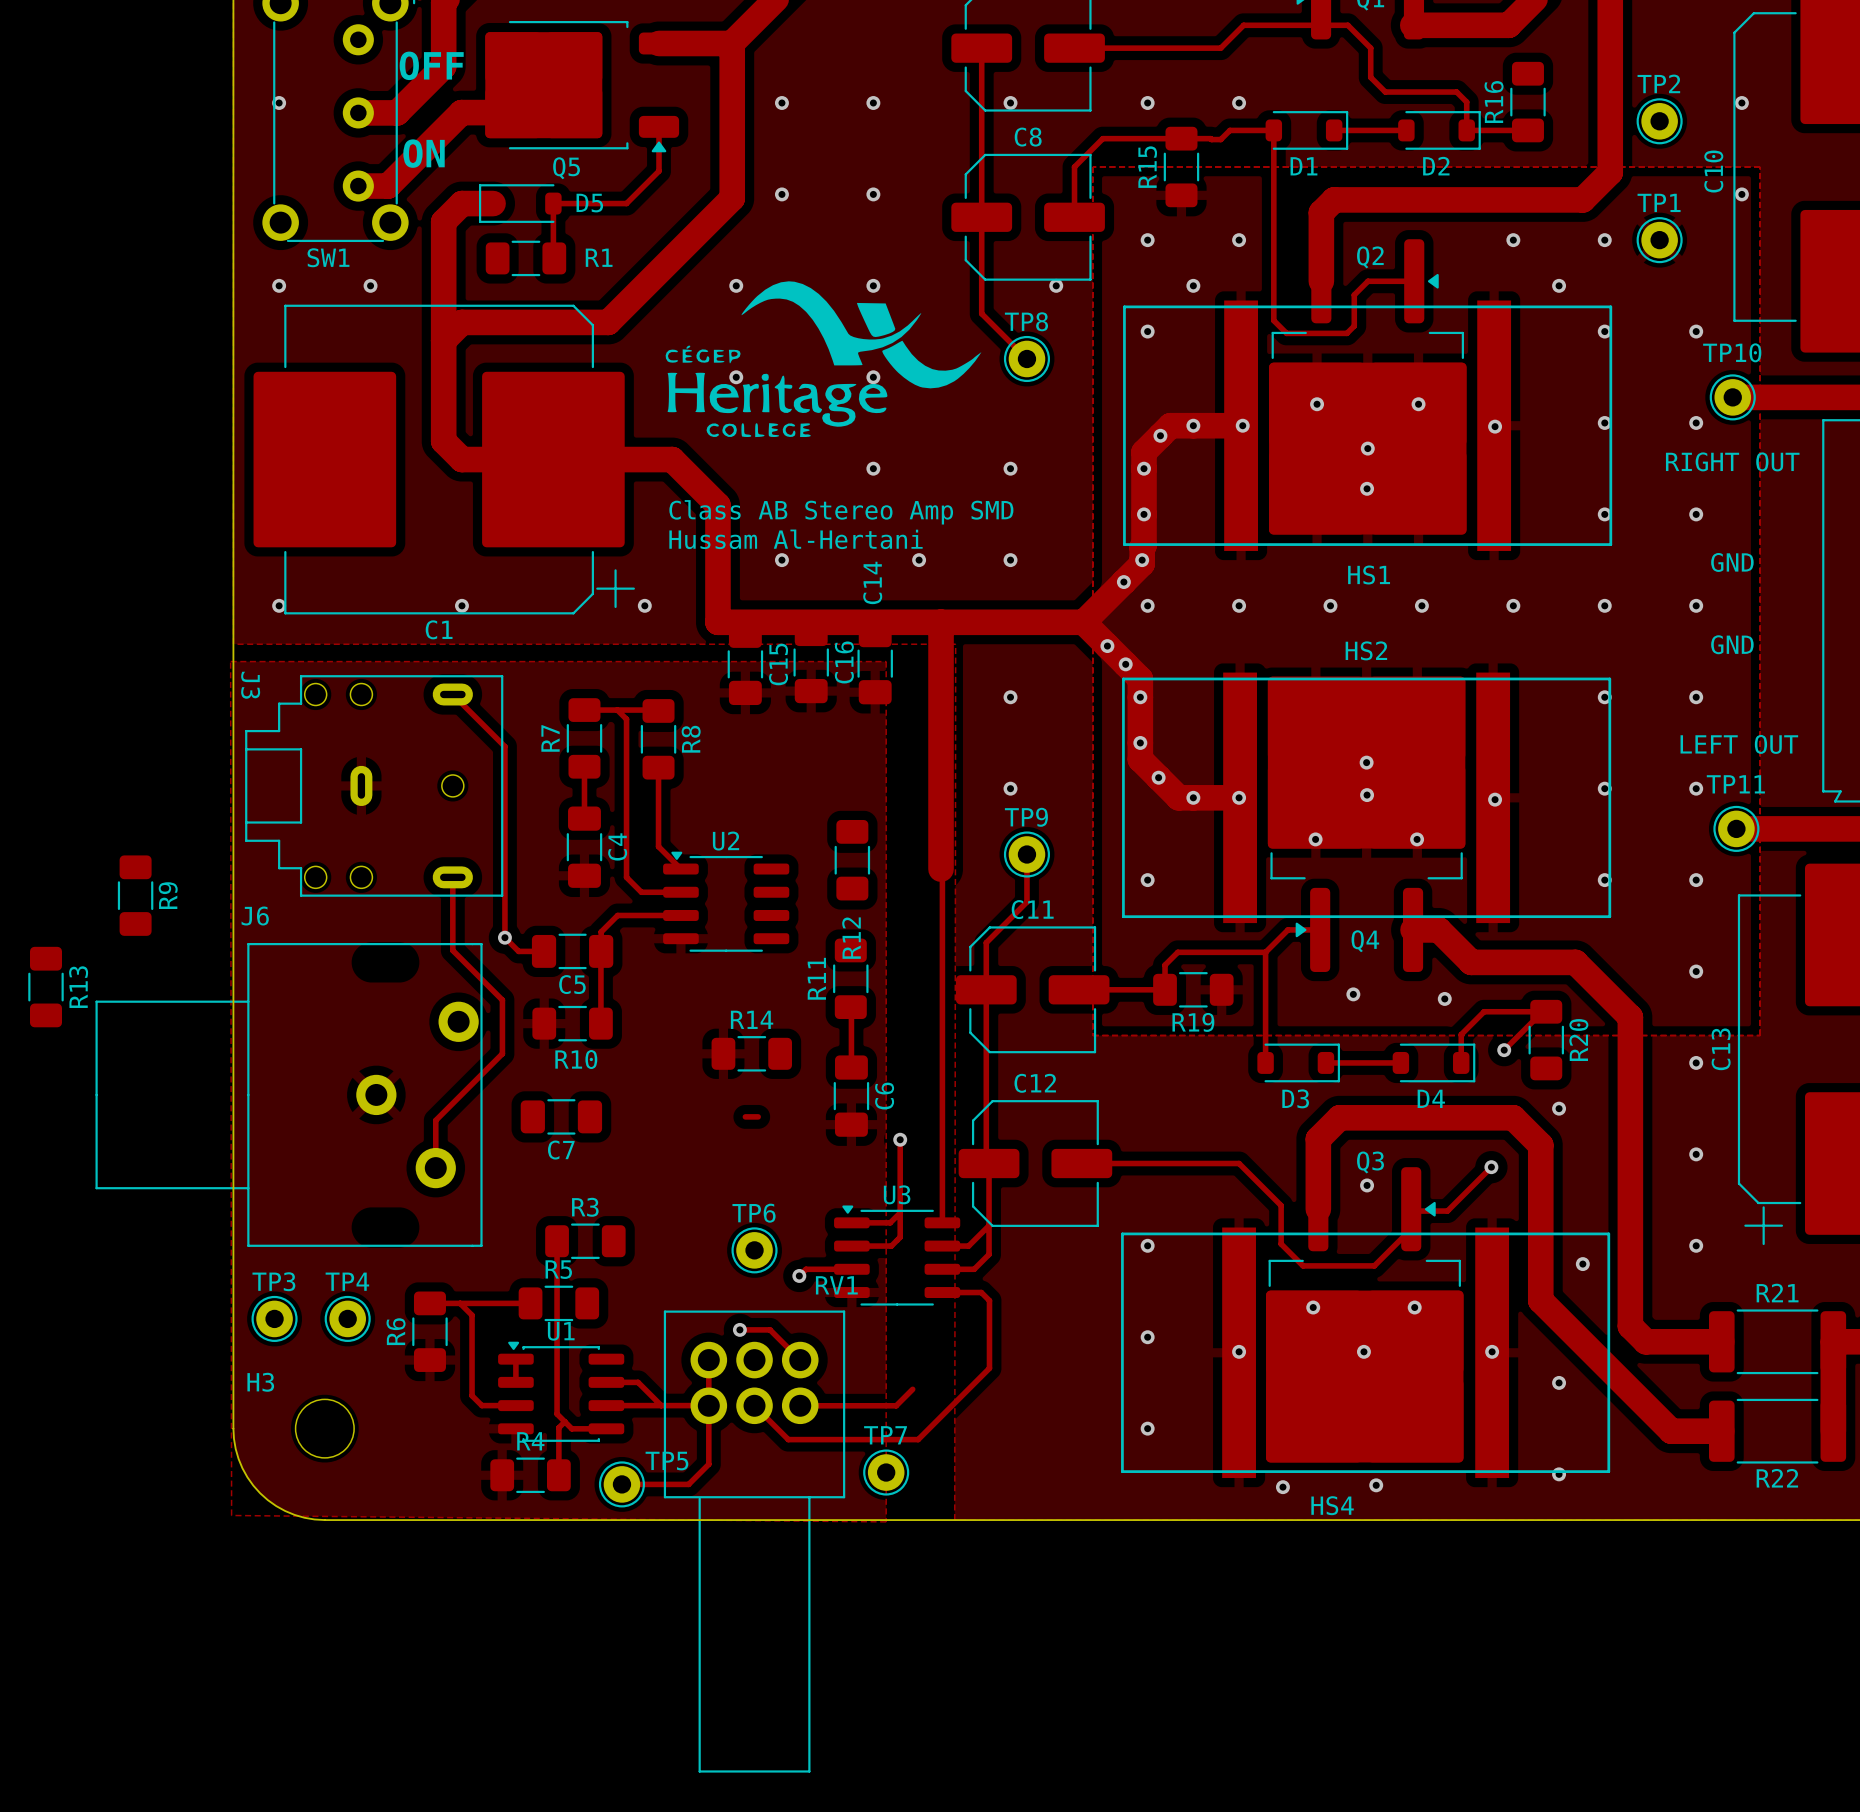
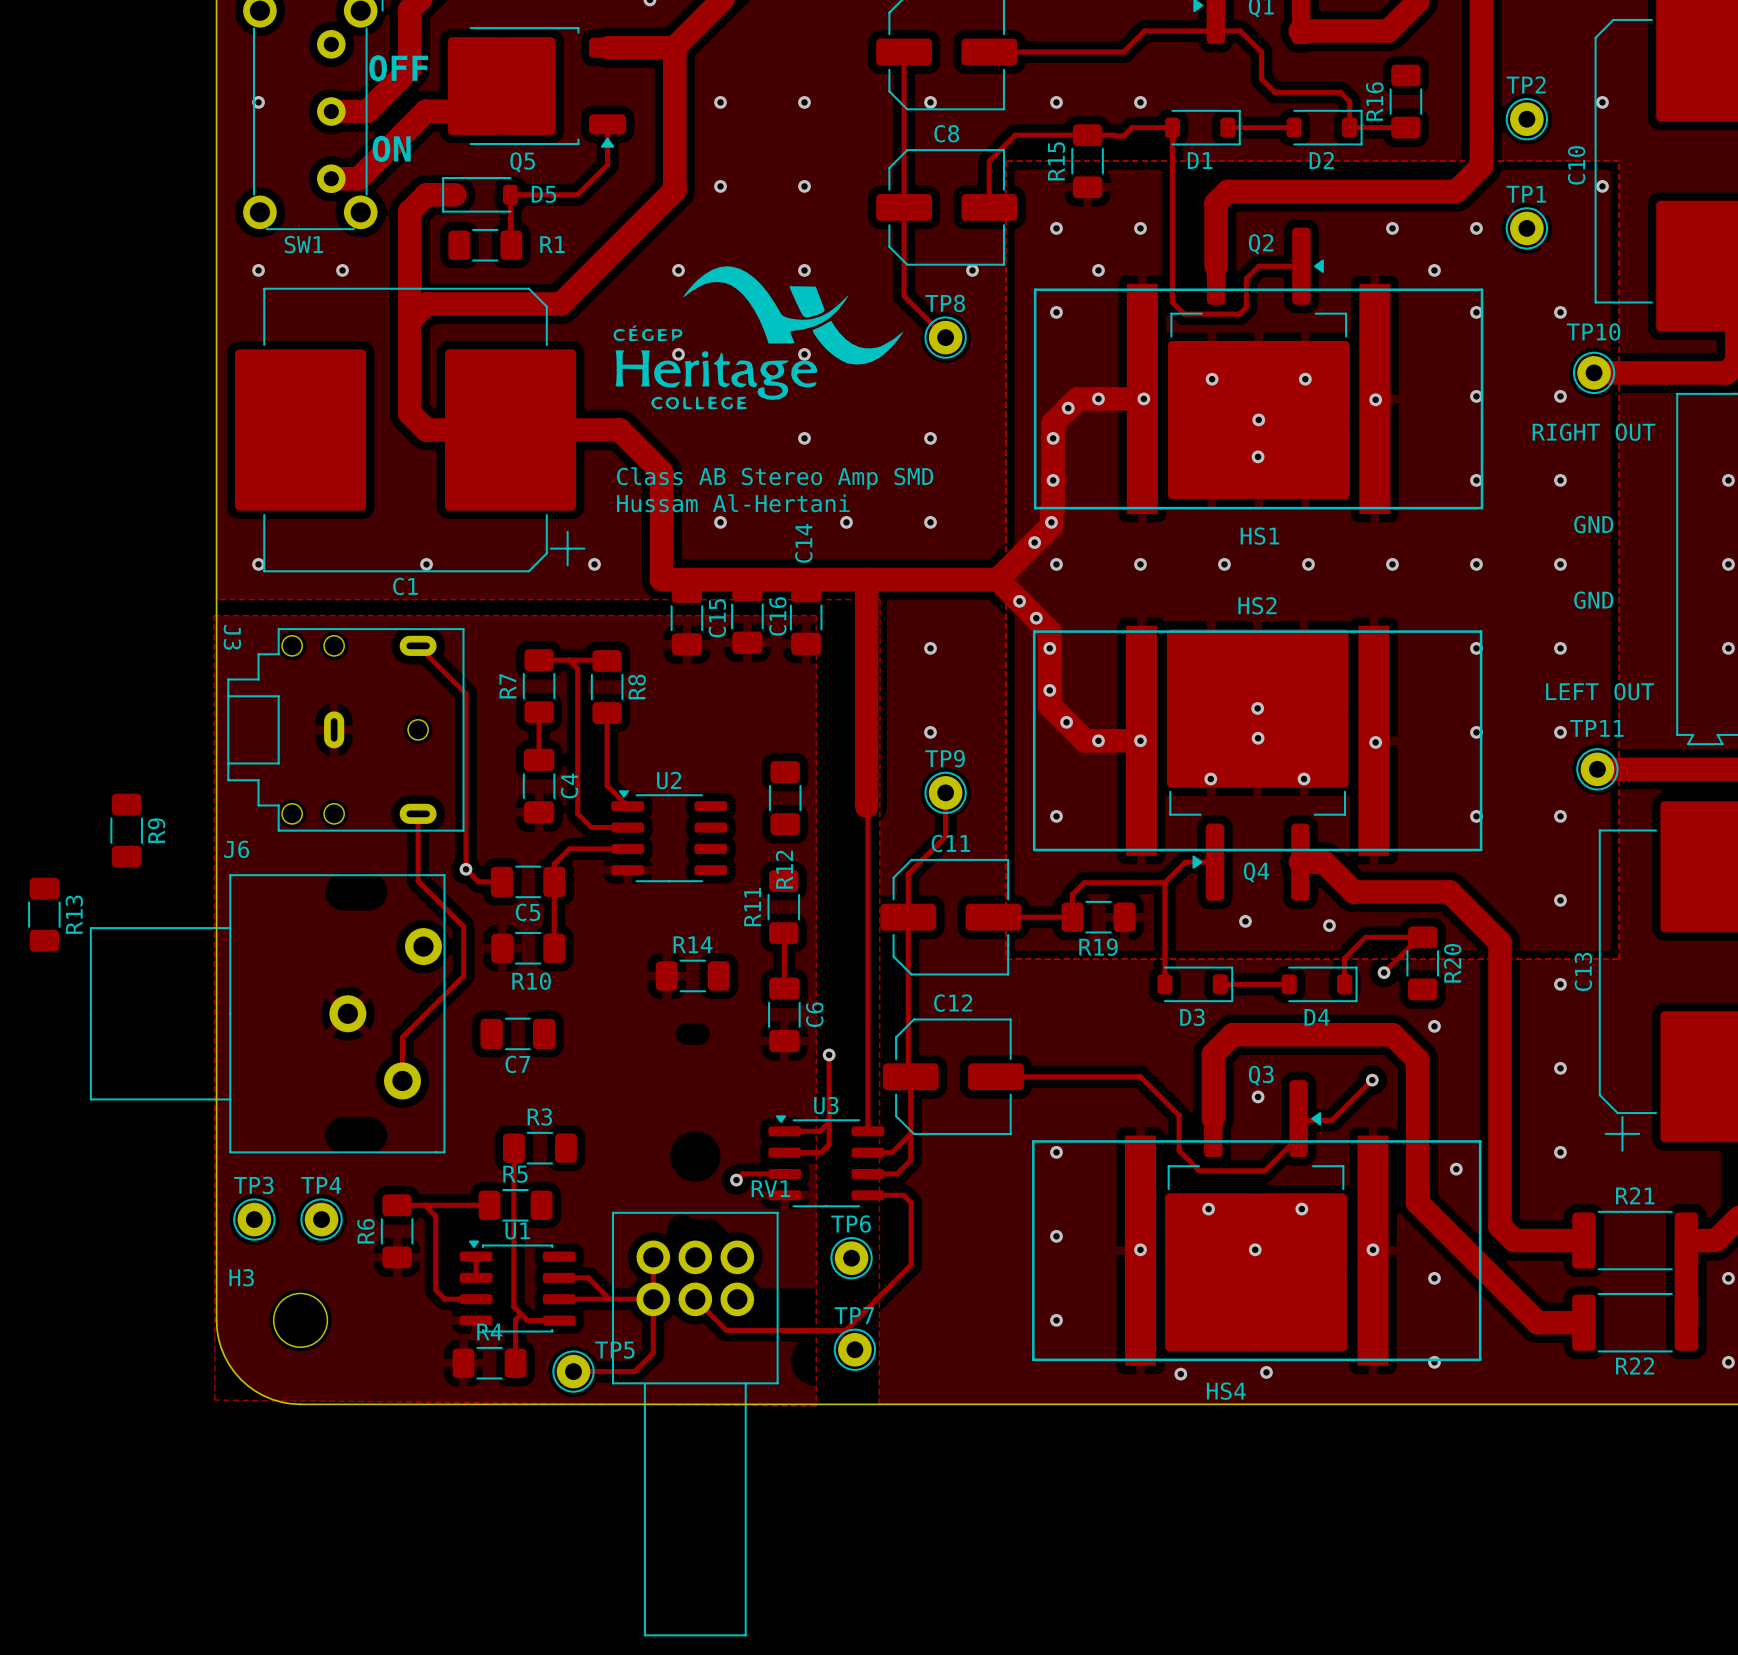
track: (745, 1116) (758, 1116) -> none
TP6 position: (754, 1250) -> (851, 1258)
track: (739, 1329) (770, 1329) (800, 1360) -> none
via: (739, 1329) -> none
track: (912, 1389) (896, 1405) (800, 1405) -> none
TP7 position: (886, 1472) -> (854, 1349)

